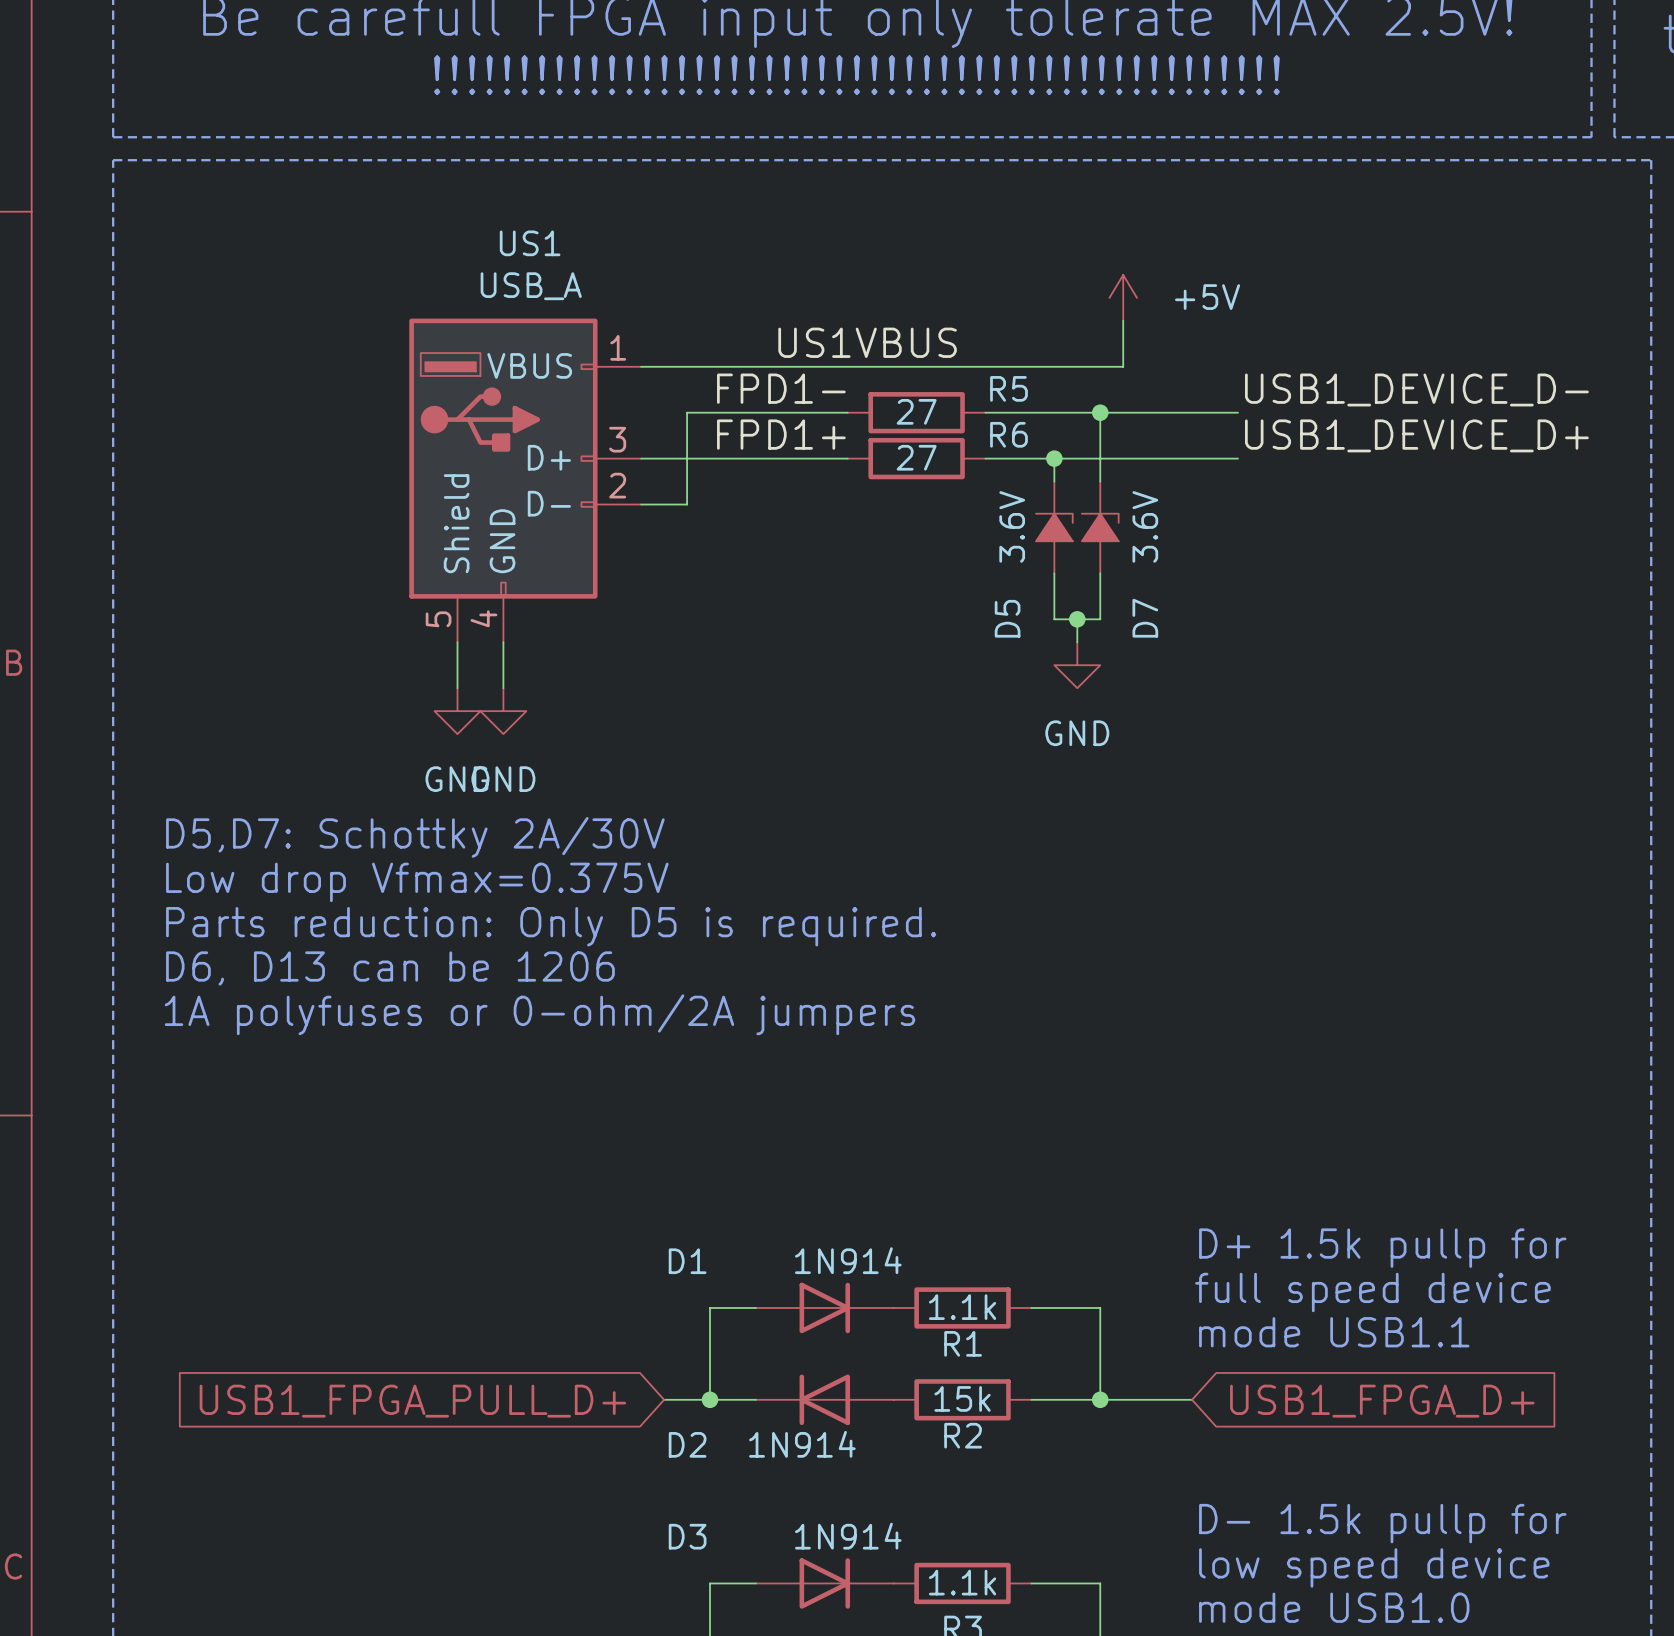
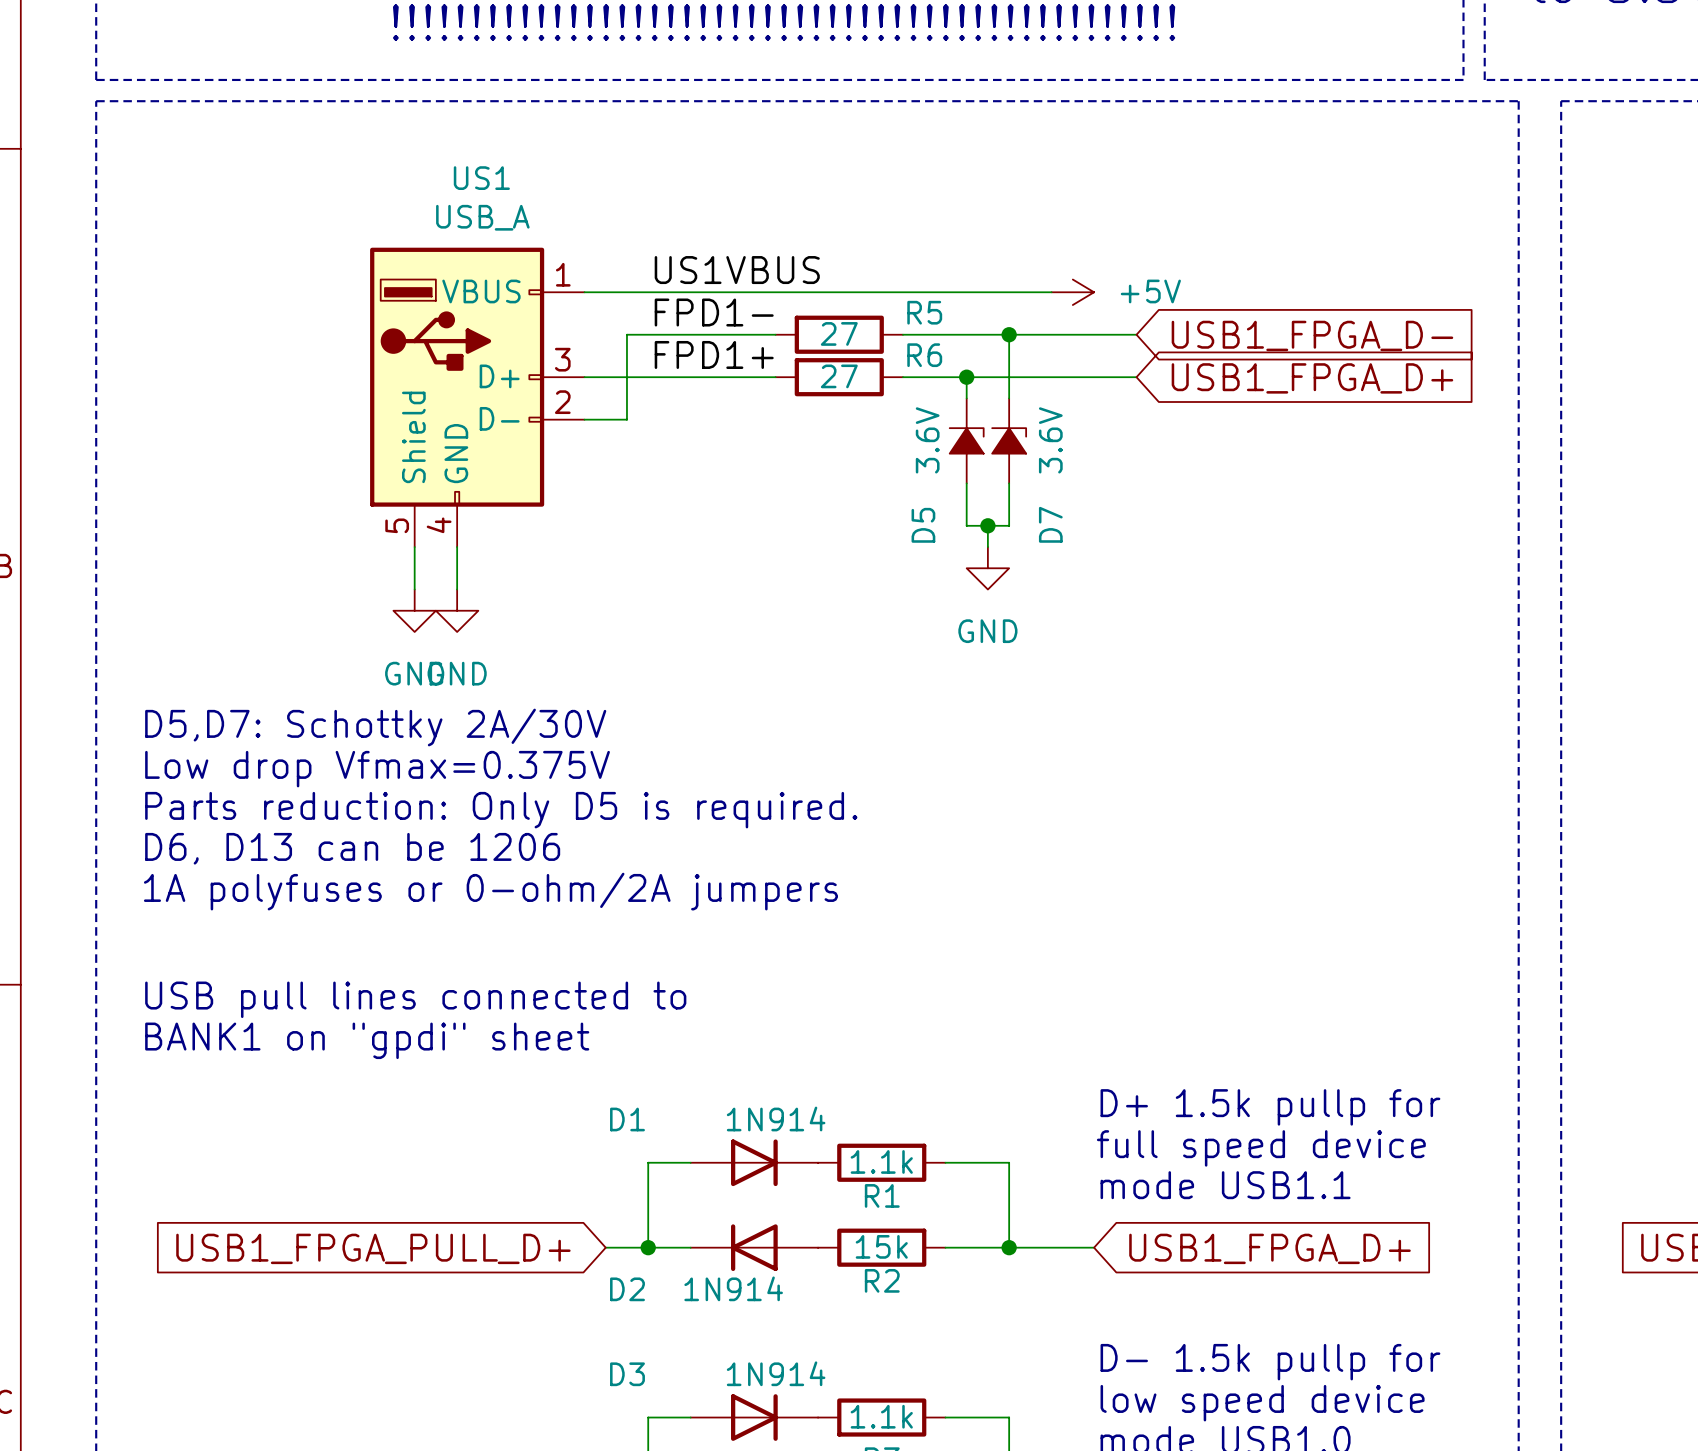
power symbol rotation: 0° (1123, 297) -> 90° clockwise (1072, 292)
power symbol position: +5V (1123, 297) -> +5V (1072, 292)
wire: (1123, 320) (1123, 366) -> (1051, 292) (1030, 292)
label position: US1VBUS (867, 342) -> US1VBUS (737, 270)
label: USB1_DEVICE_D- (1416, 389) -> none
global label: none -> USB1_FPGA_D- (1312, 335)
label: USB1_DEVICE_D+ (1416, 435) -> none
global label: none -> USB1_FPGA_D+ (1312, 378)
text: none -> USB pull lines connected to (415, 999)
text: none -> BANK1 on "gpdi" sheet (367, 1040)

